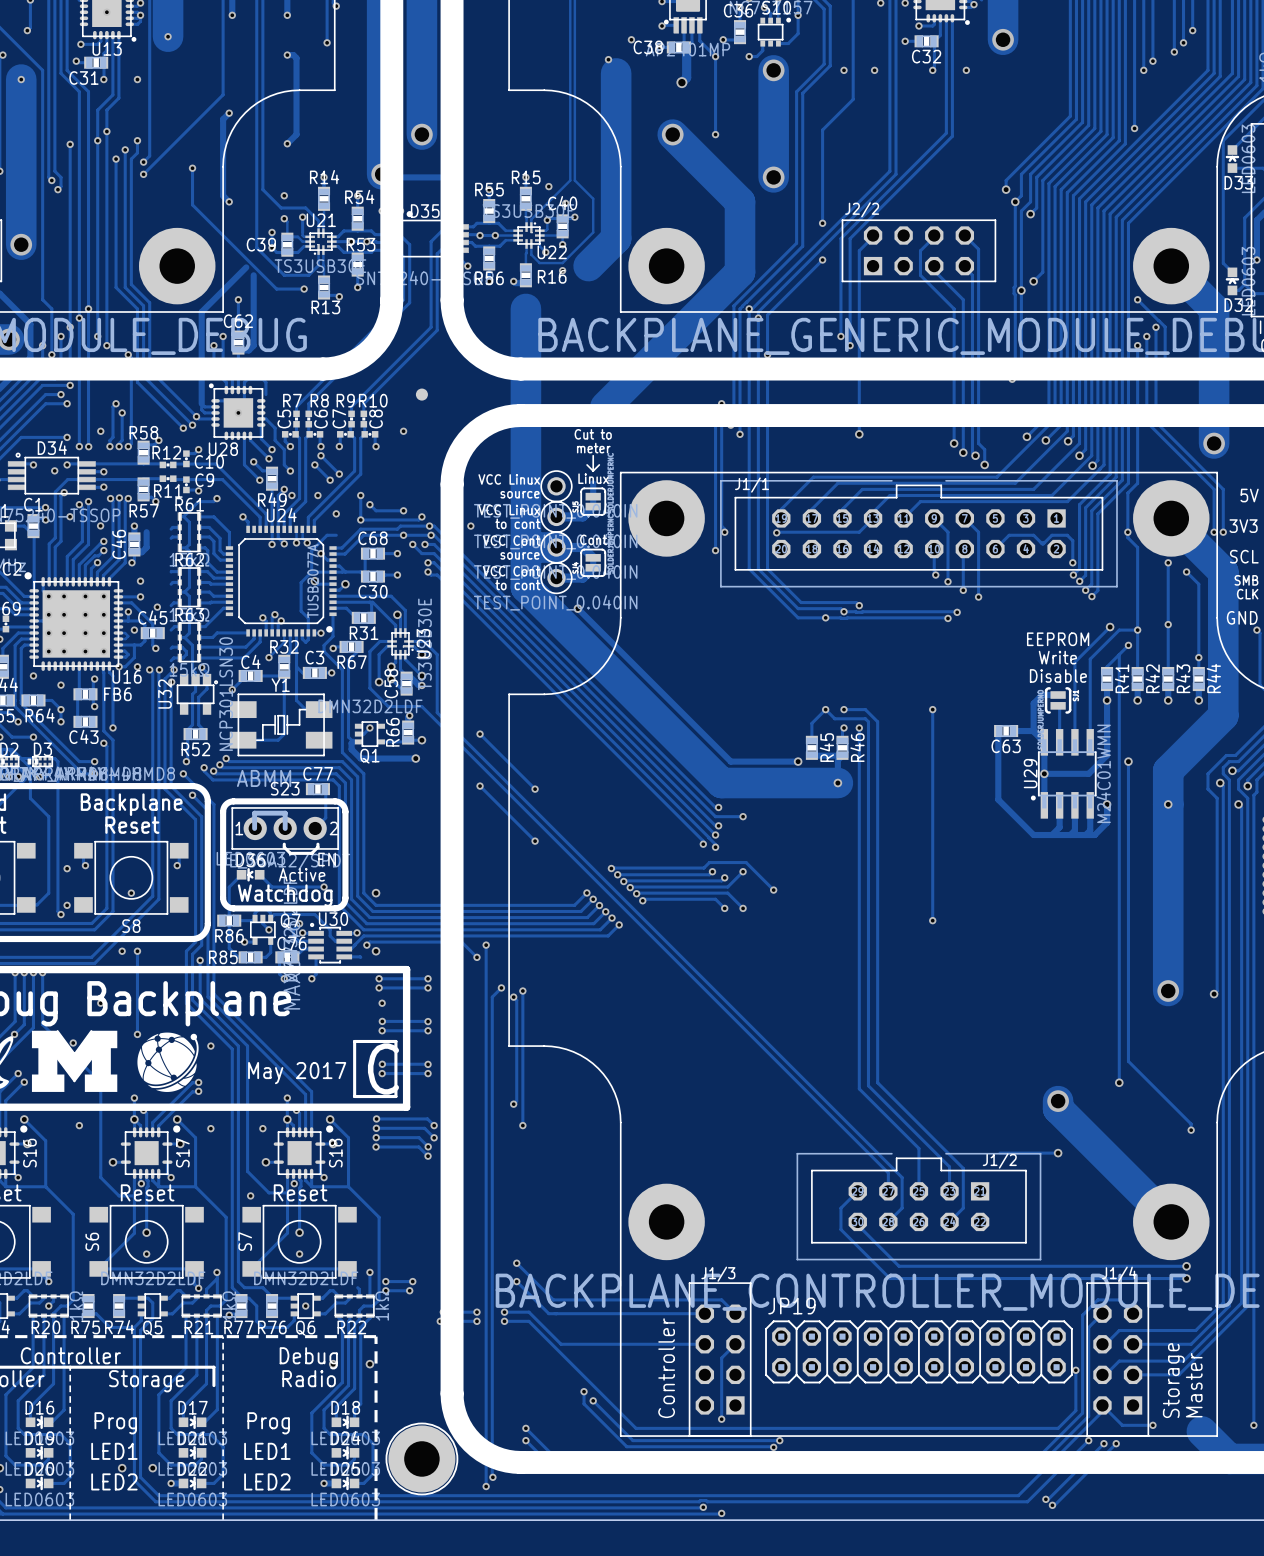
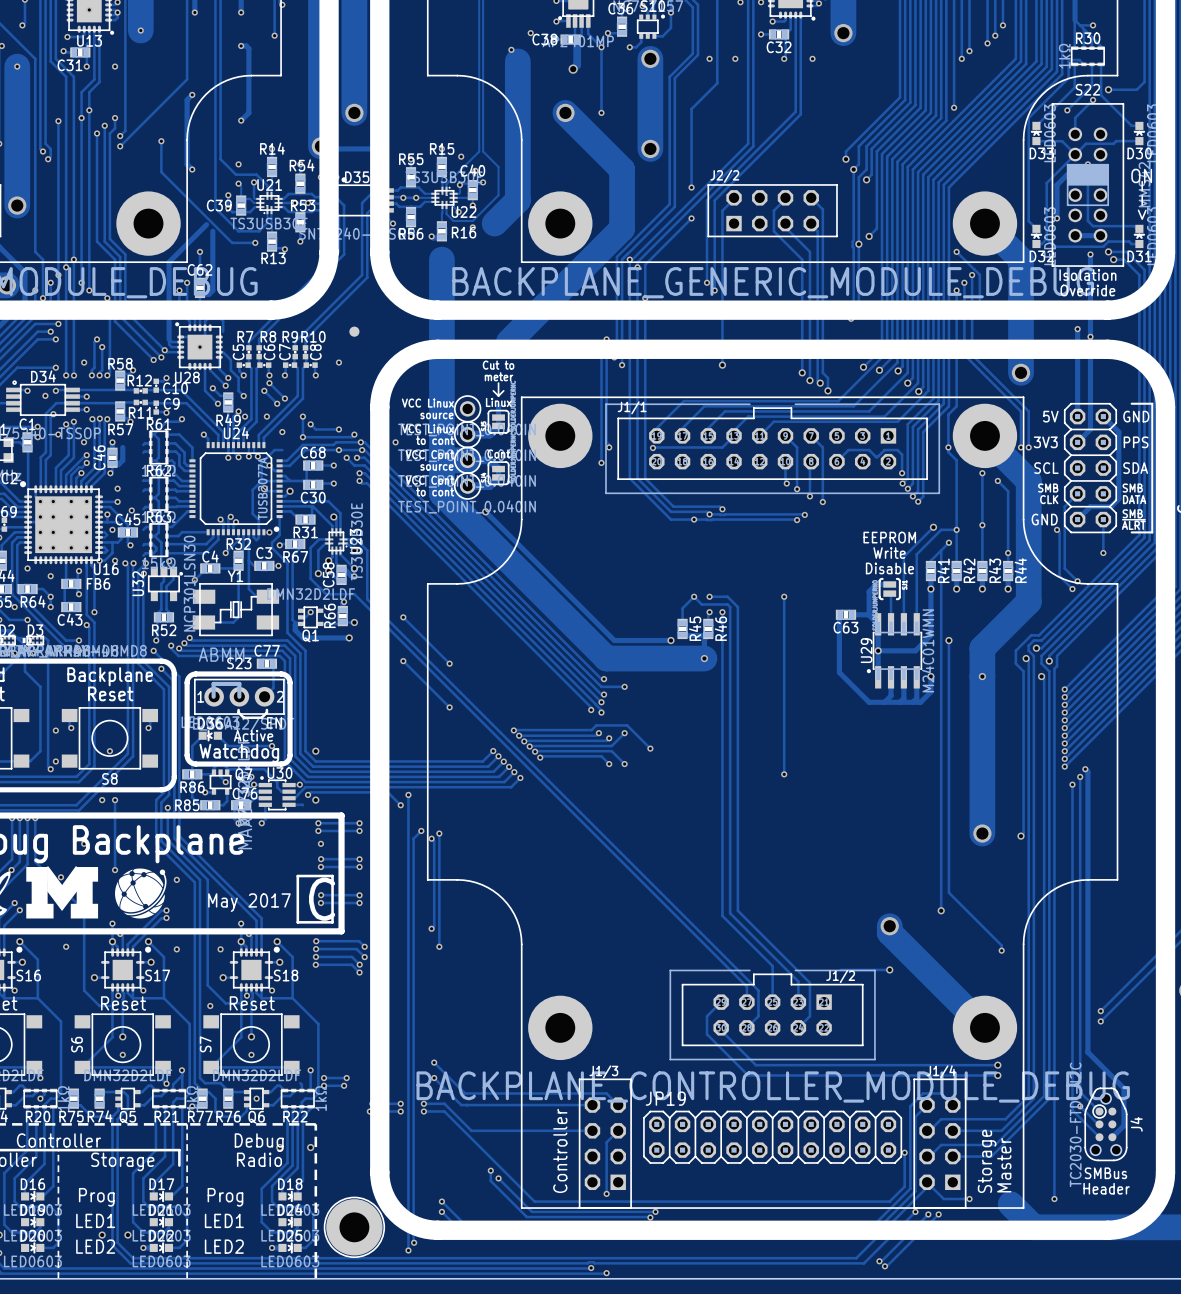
S17 name rotation: 0° (182, 1152) -> 90° clockwise (157, 975)
S16 name rotation: 0° (29, 1153) -> 90° clockwise (28, 975)
S18 name rotation: 0° (335, 1153) -> 90° clockwise (286, 975)

